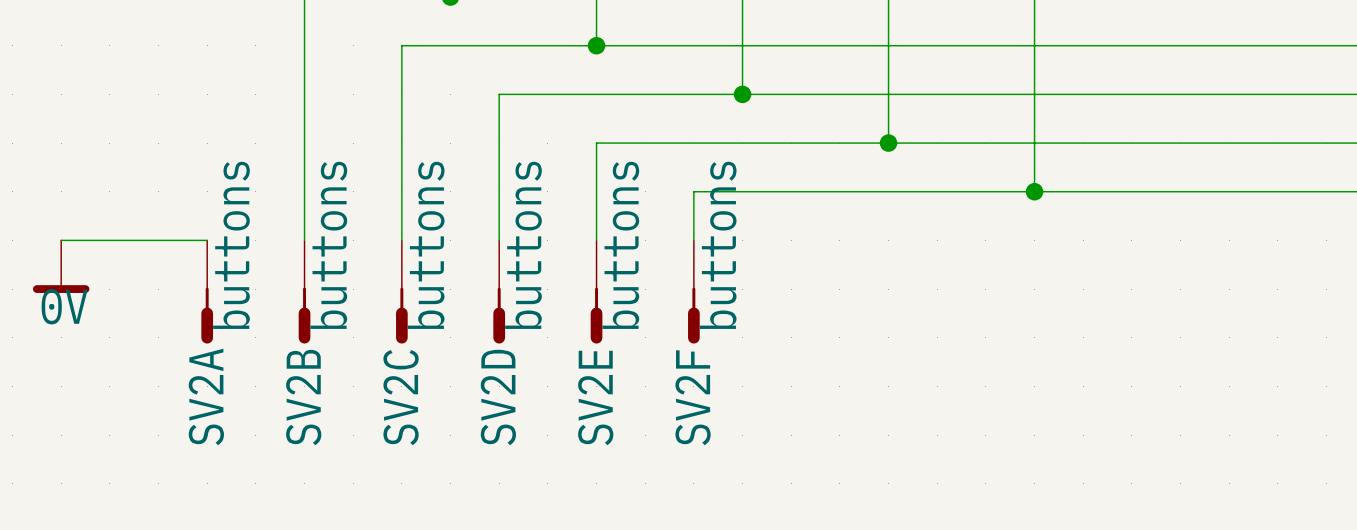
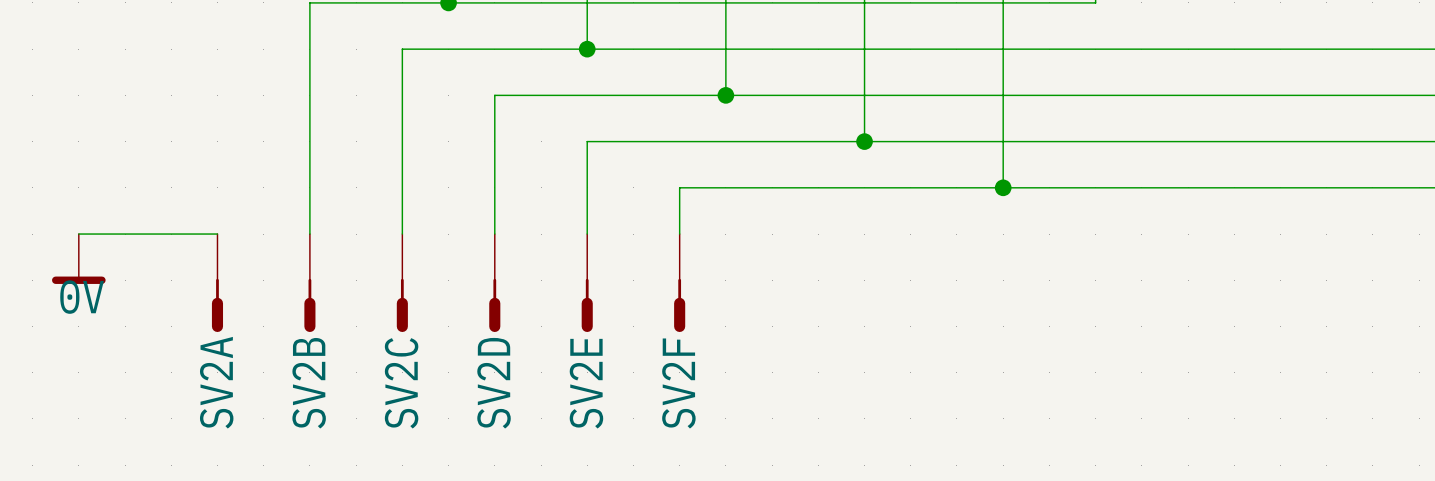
SV2A value: buttons (231, 245) -> none
SV2B value: buttons (328, 245) -> none
SV2C value: buttons (426, 245) -> none
SV2D value: buttons (523, 245) -> none
SV2E value: buttons (620, 245) -> none
SV2F value: buttons (718, 245) -> none

